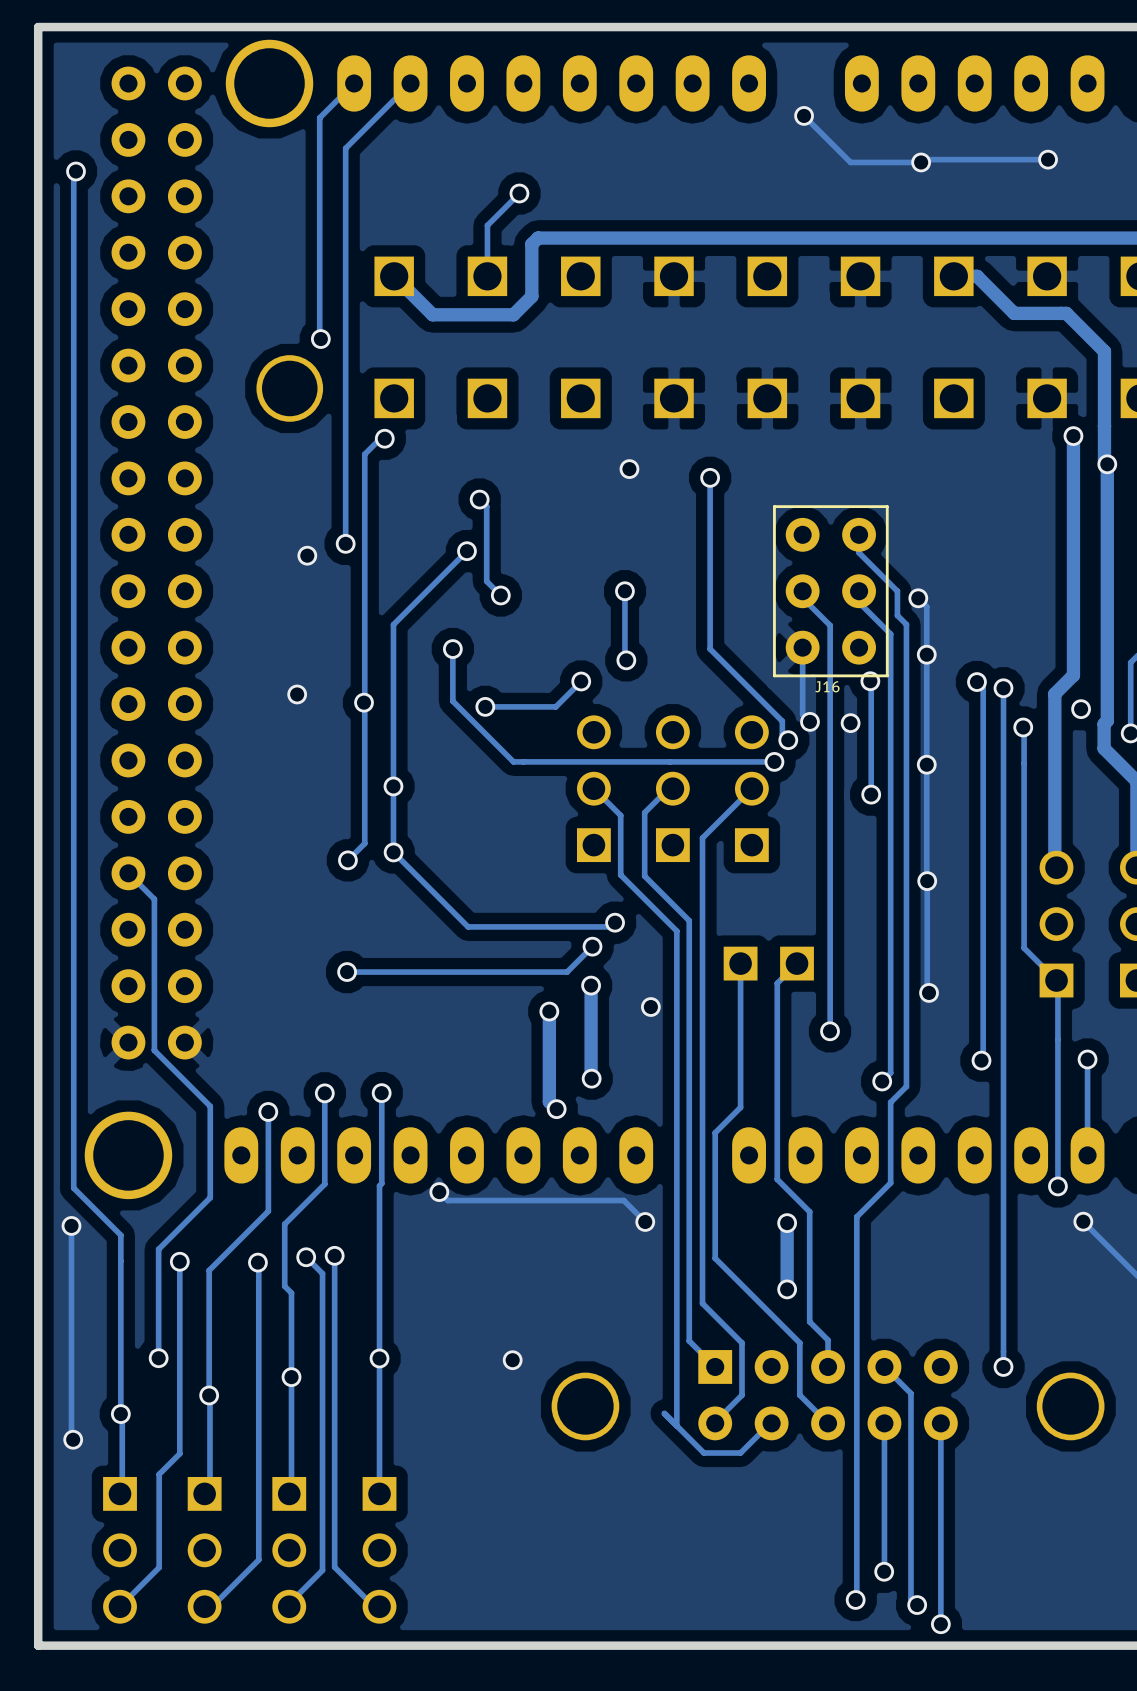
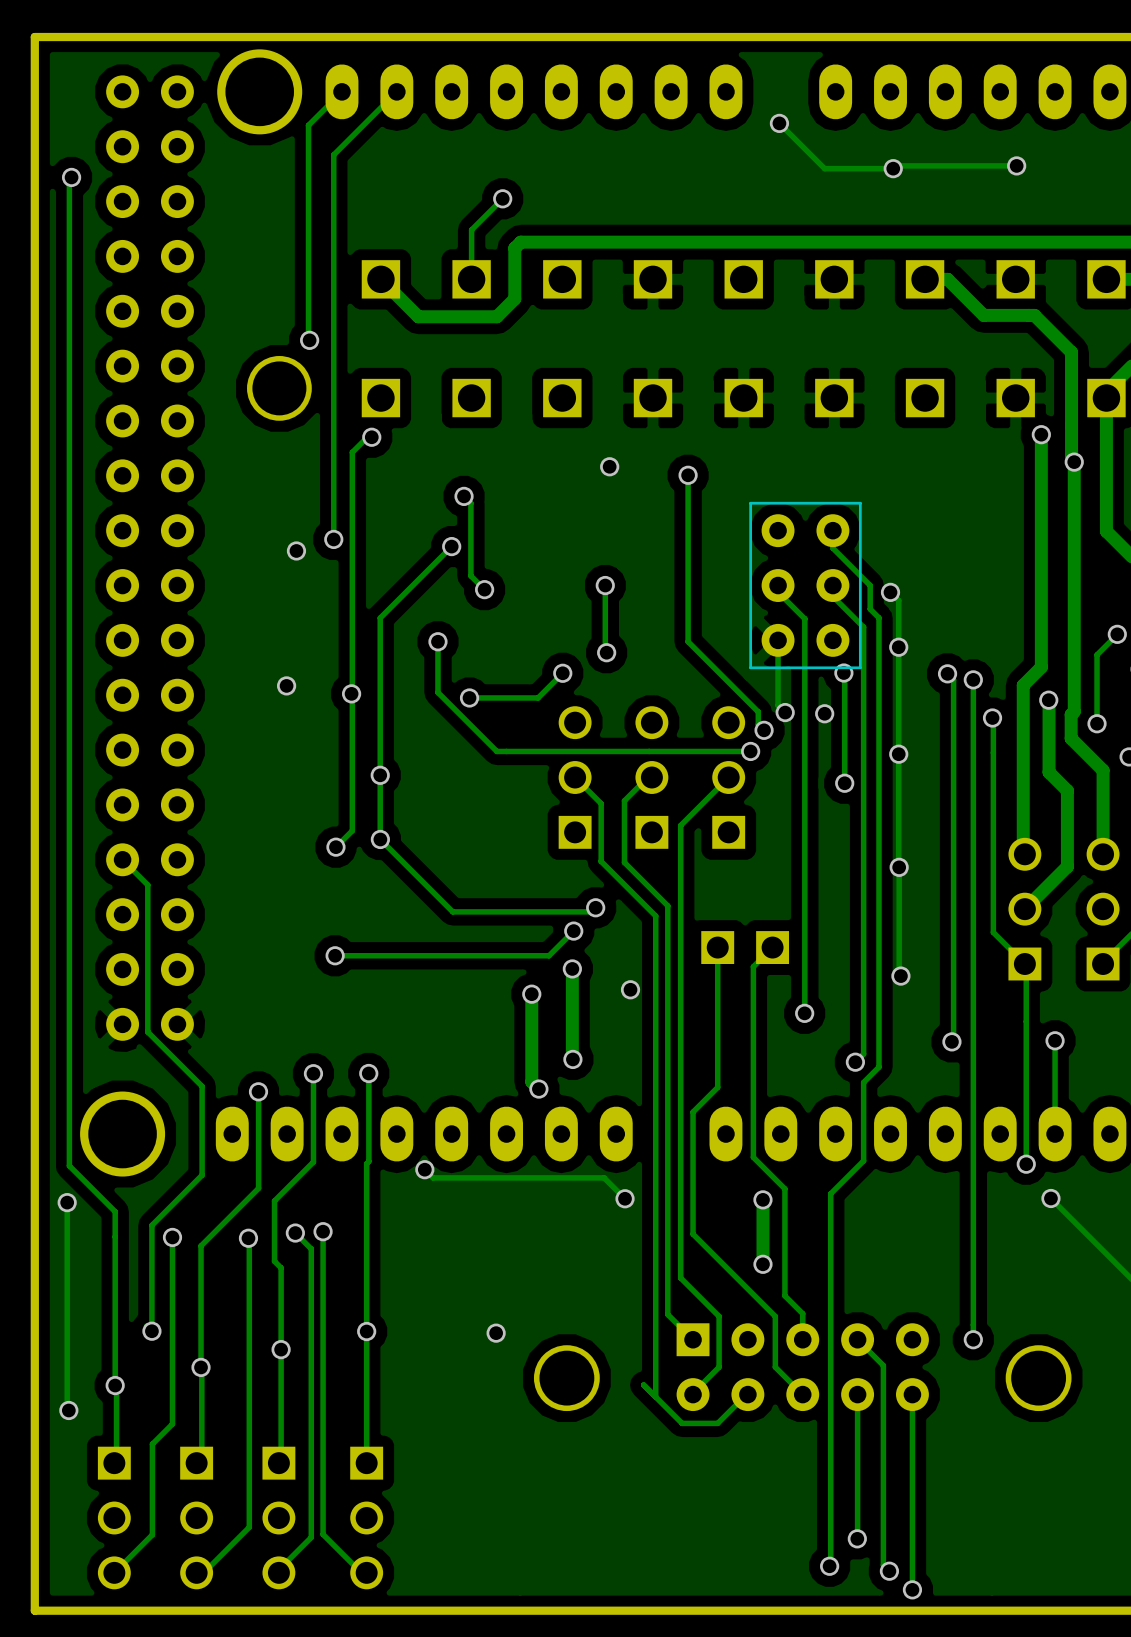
text: J16 (827, 686) -> none
track: none -> (1049, 700) (1049, 772) (1067, 790) (1067, 866) (1024, 909)

